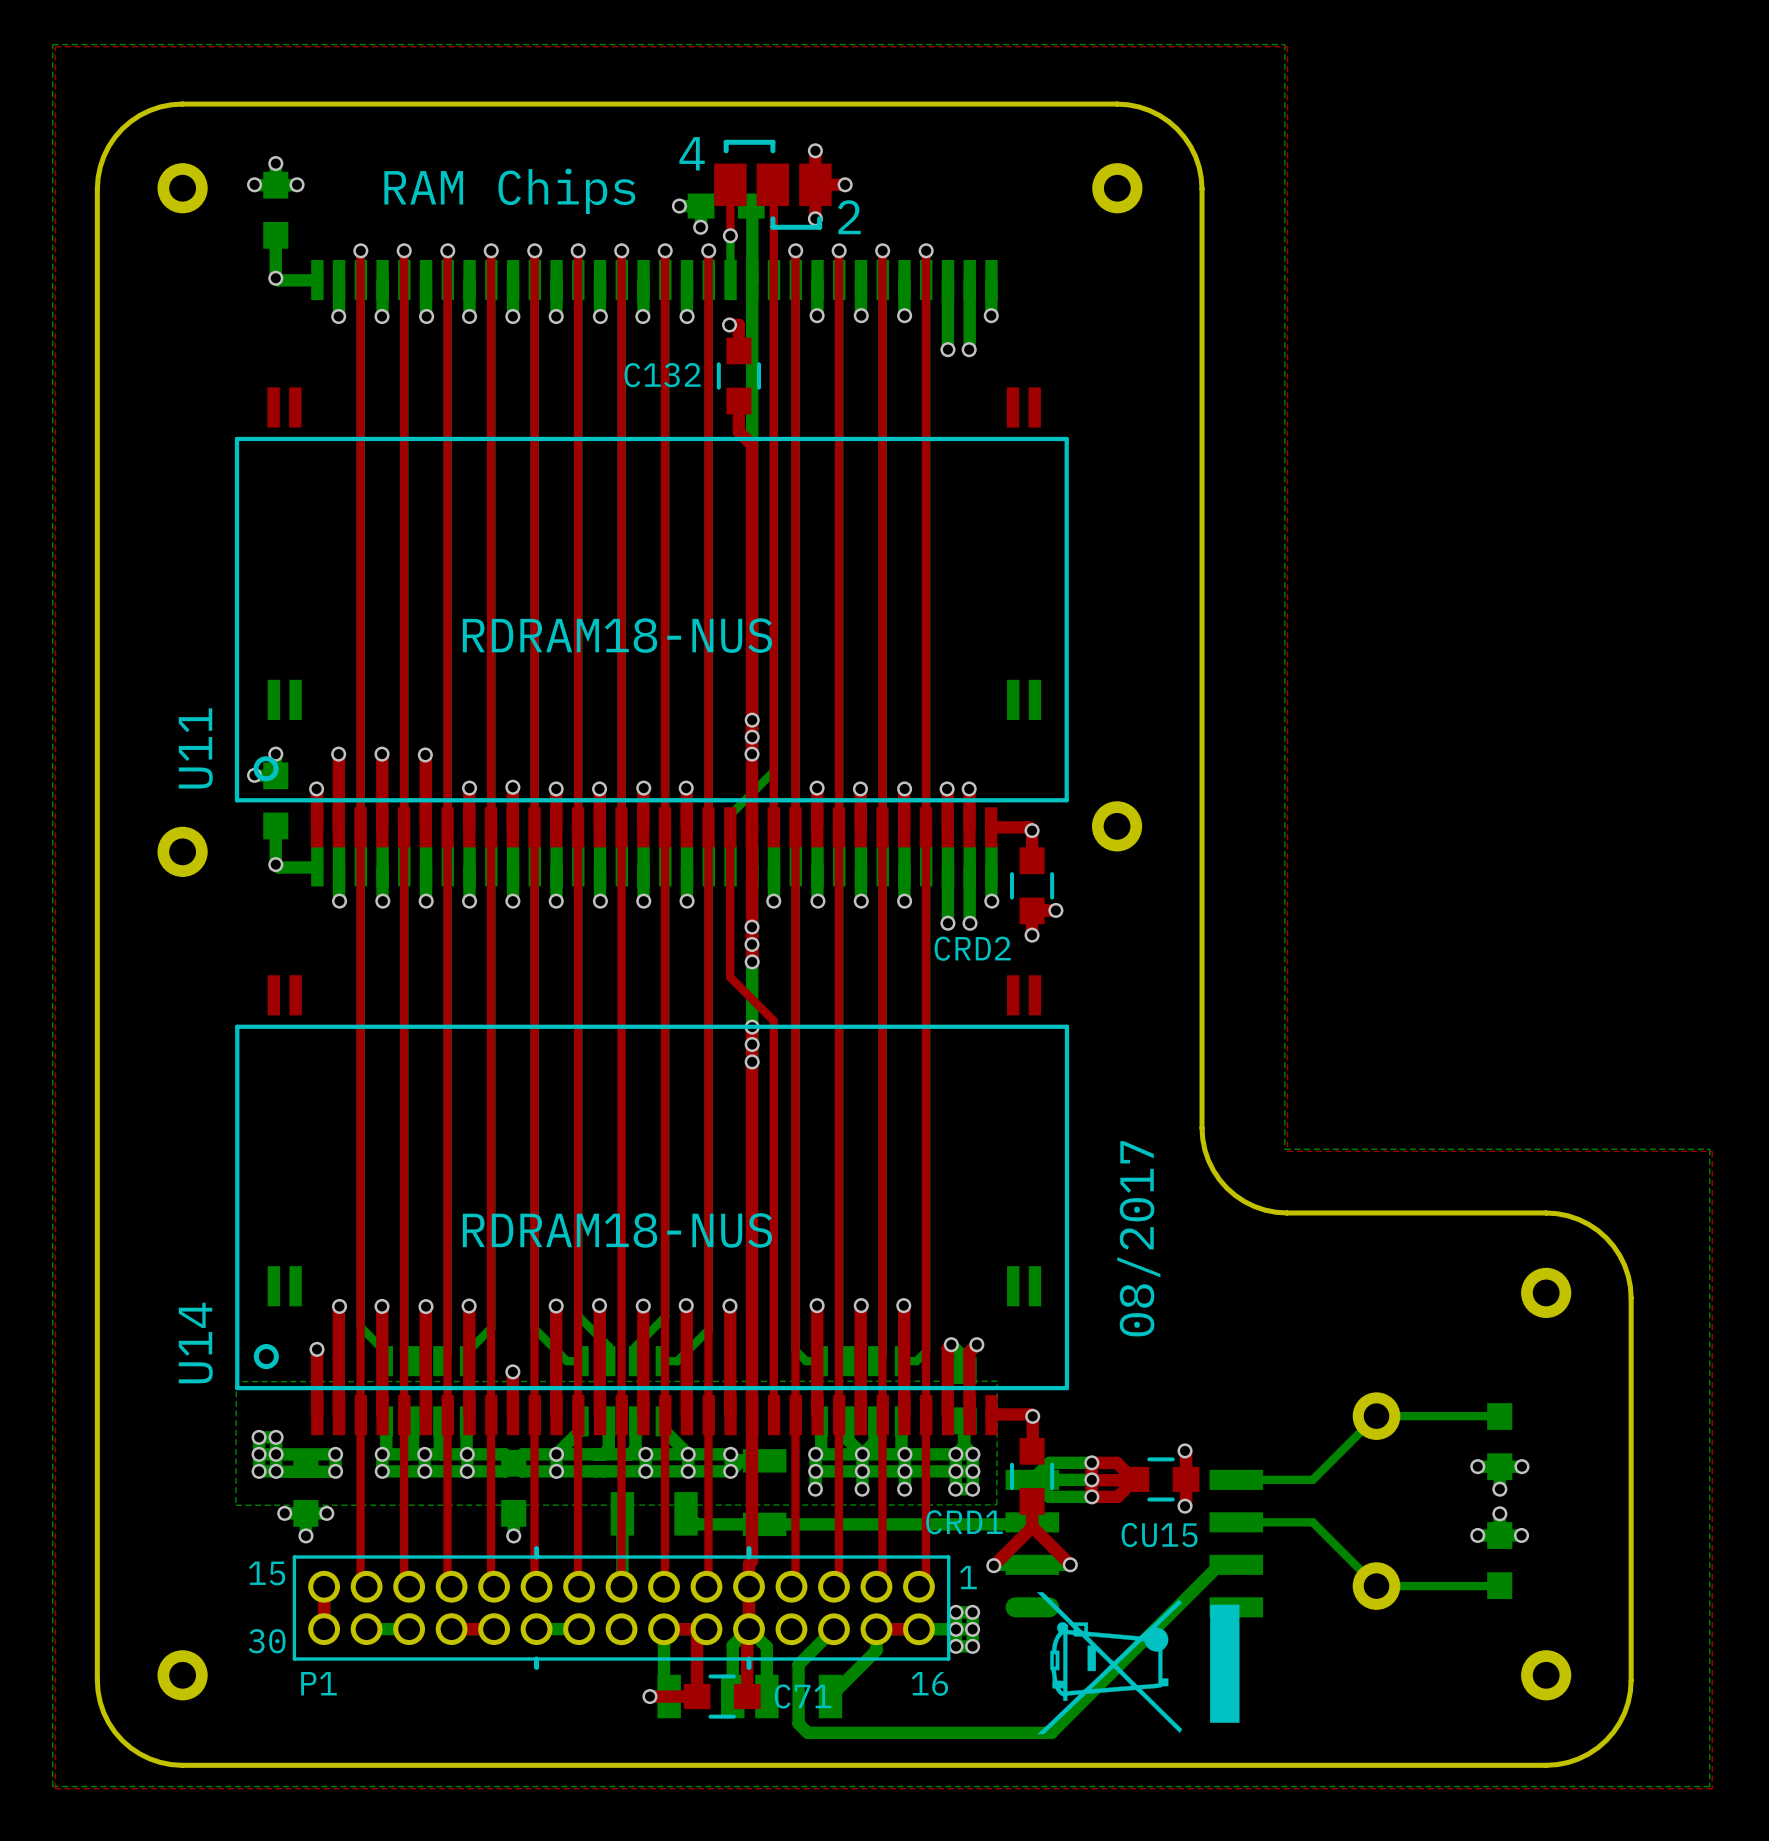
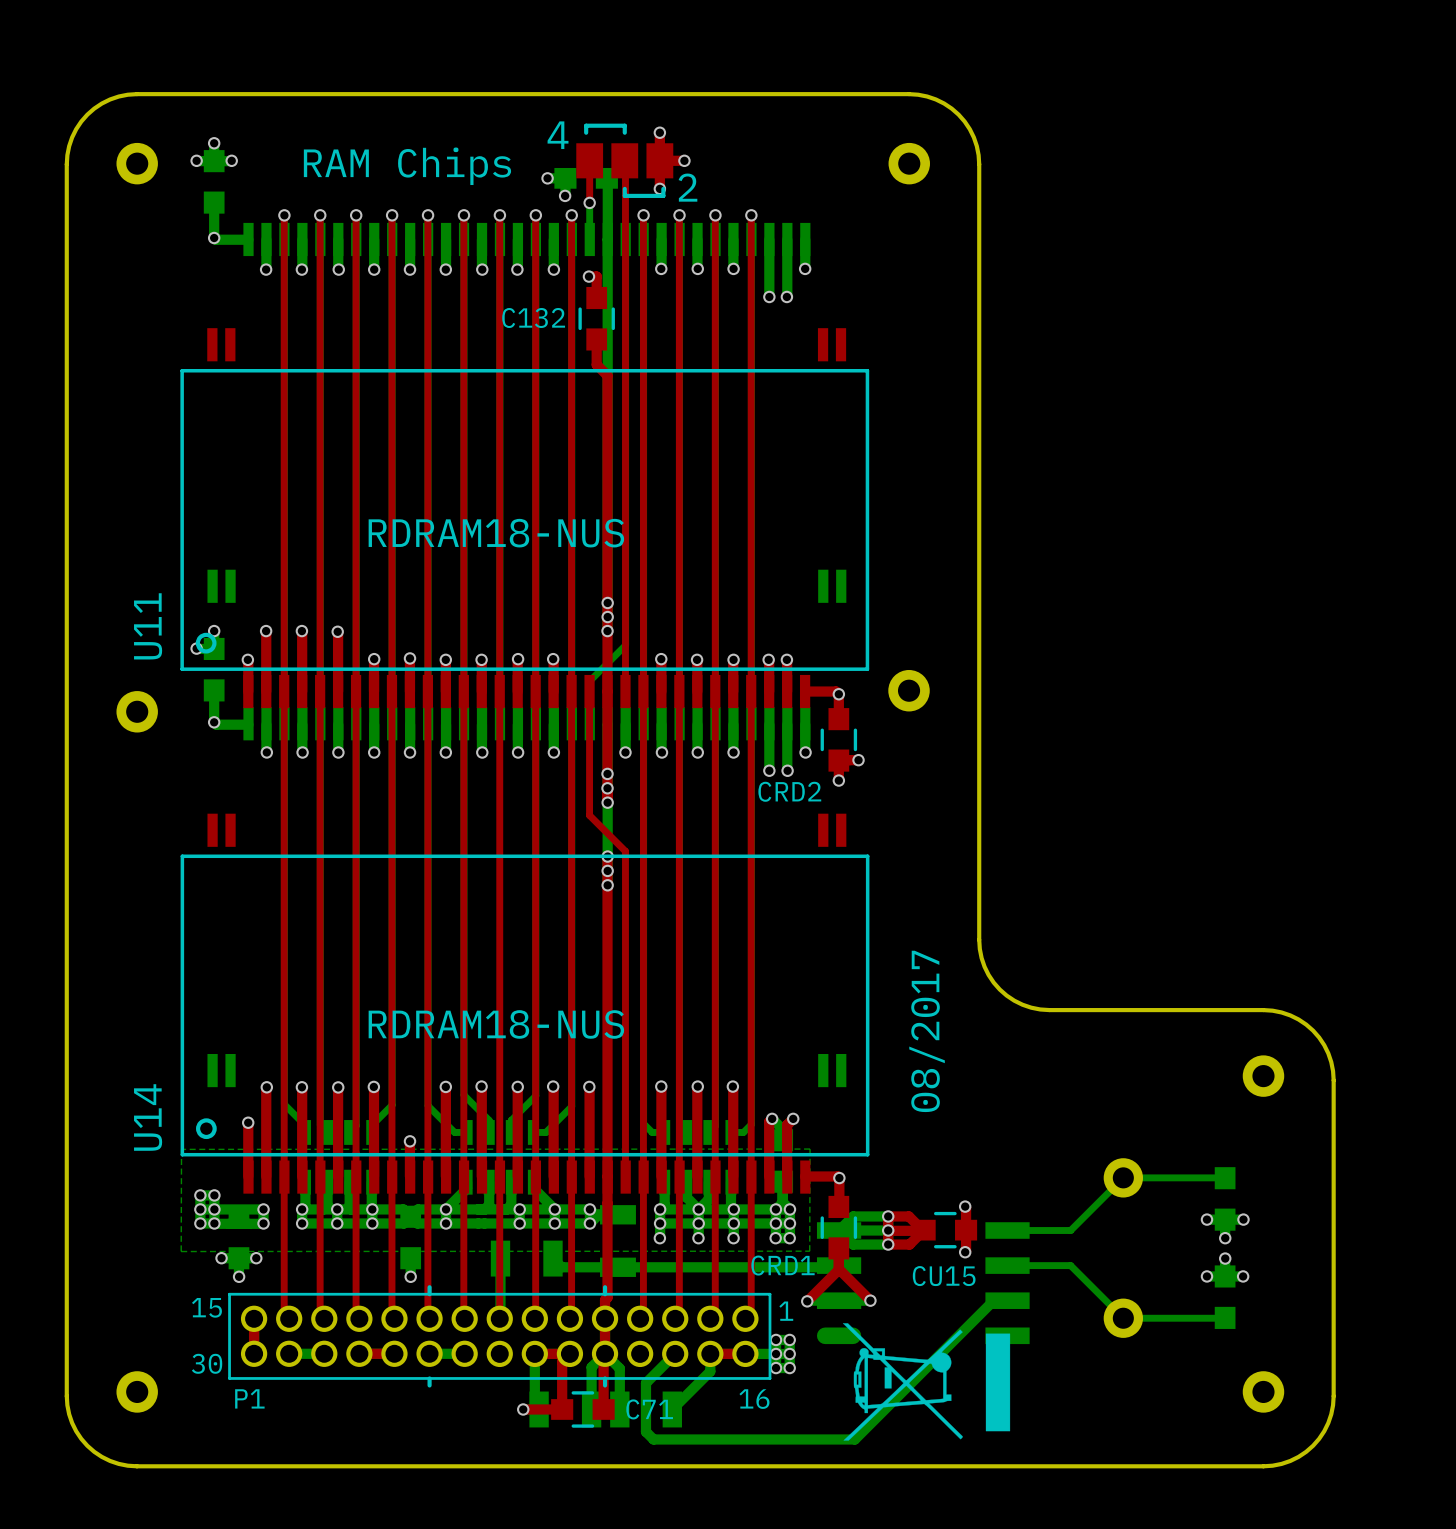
bottom zone outline: (52, 44) (52, 1786) (1709, 1786) (1709, 1149) (1284, 1149) (1284, 44) (52, 44) -> none
top zone outline: (55, 46) (55, 1788) (1712, 1788) (1712, 1151) (1287, 1151) (1287, 46) (55, 46) -> none

